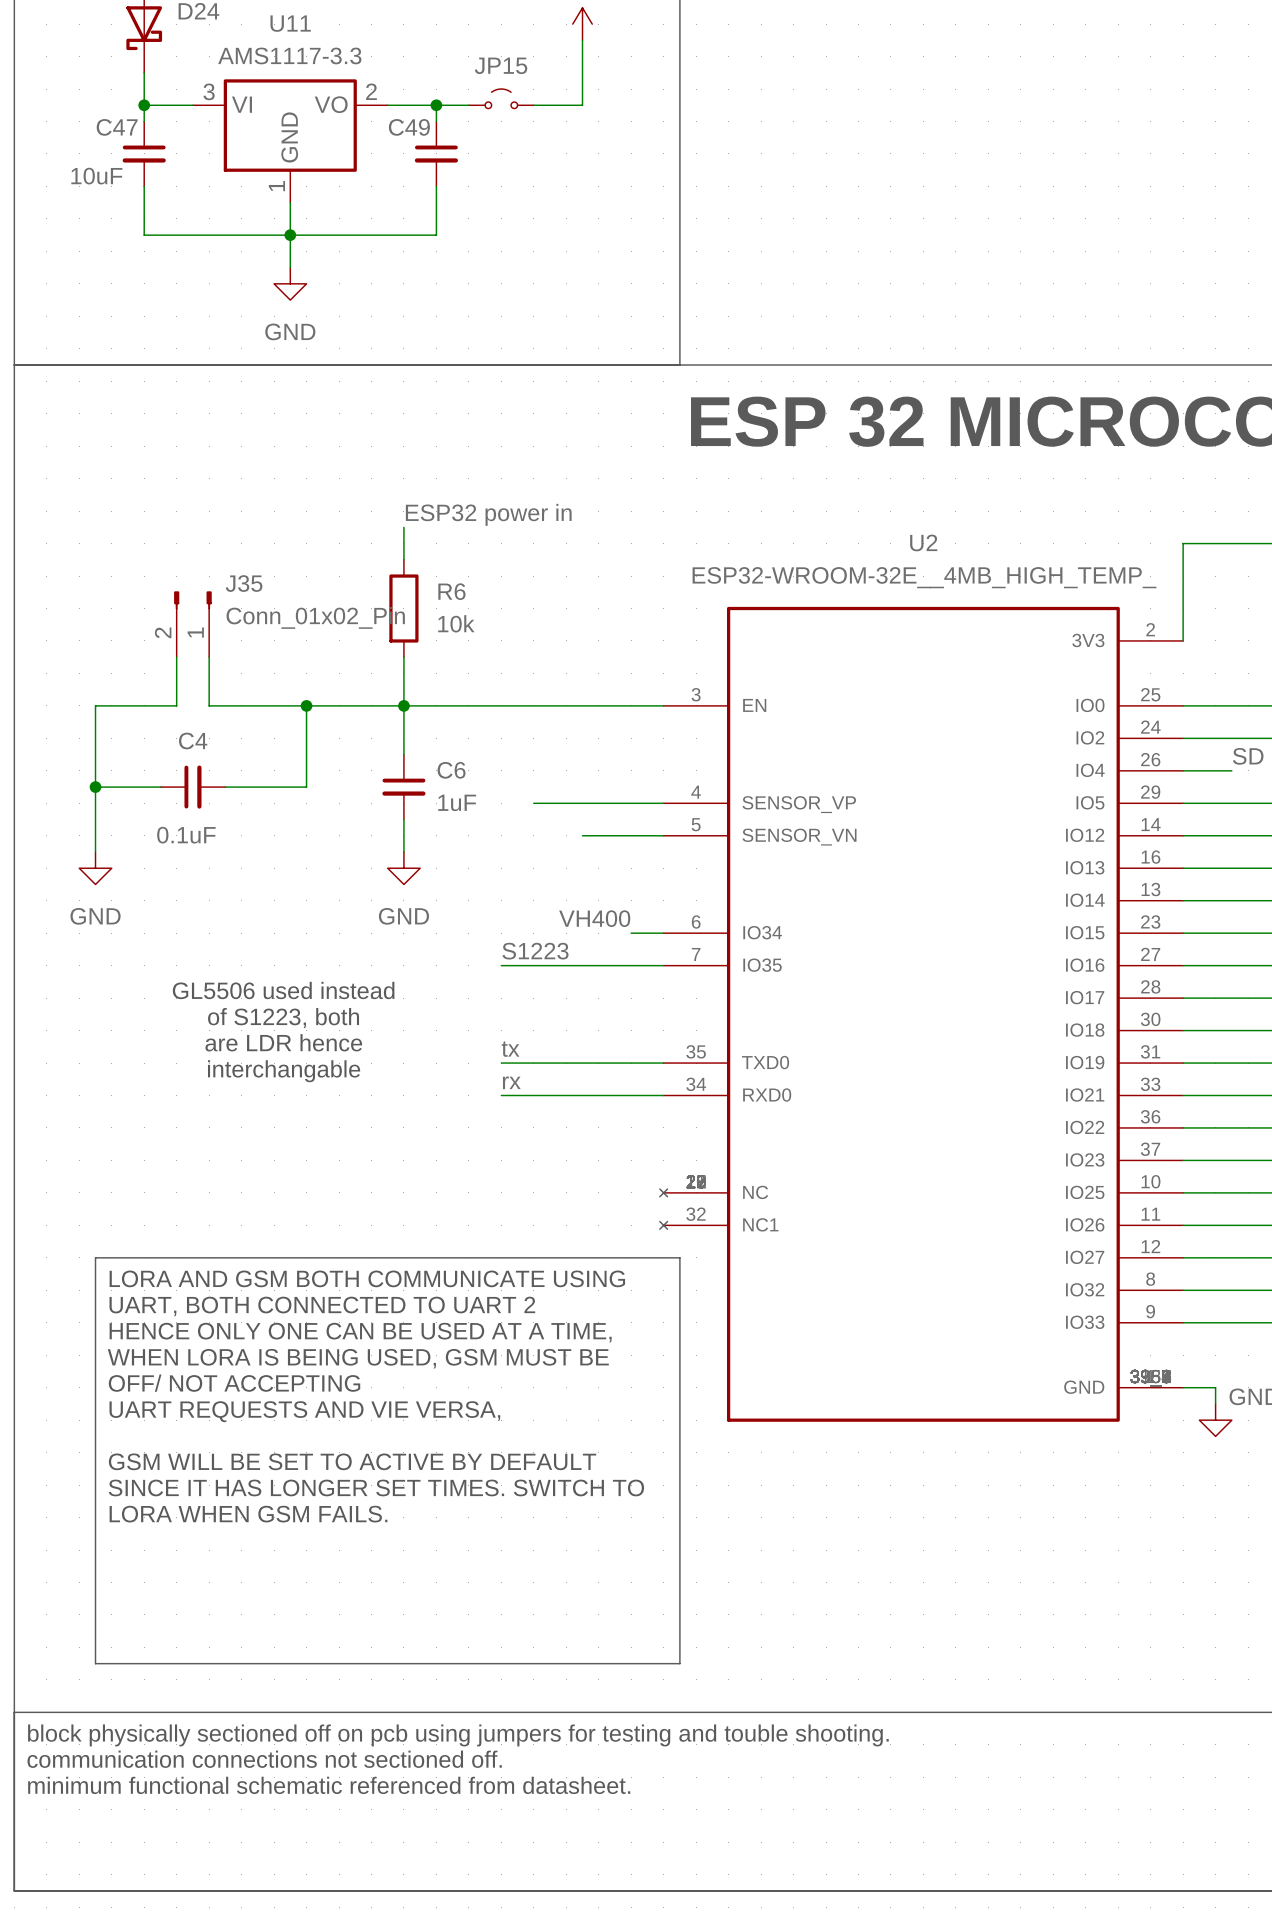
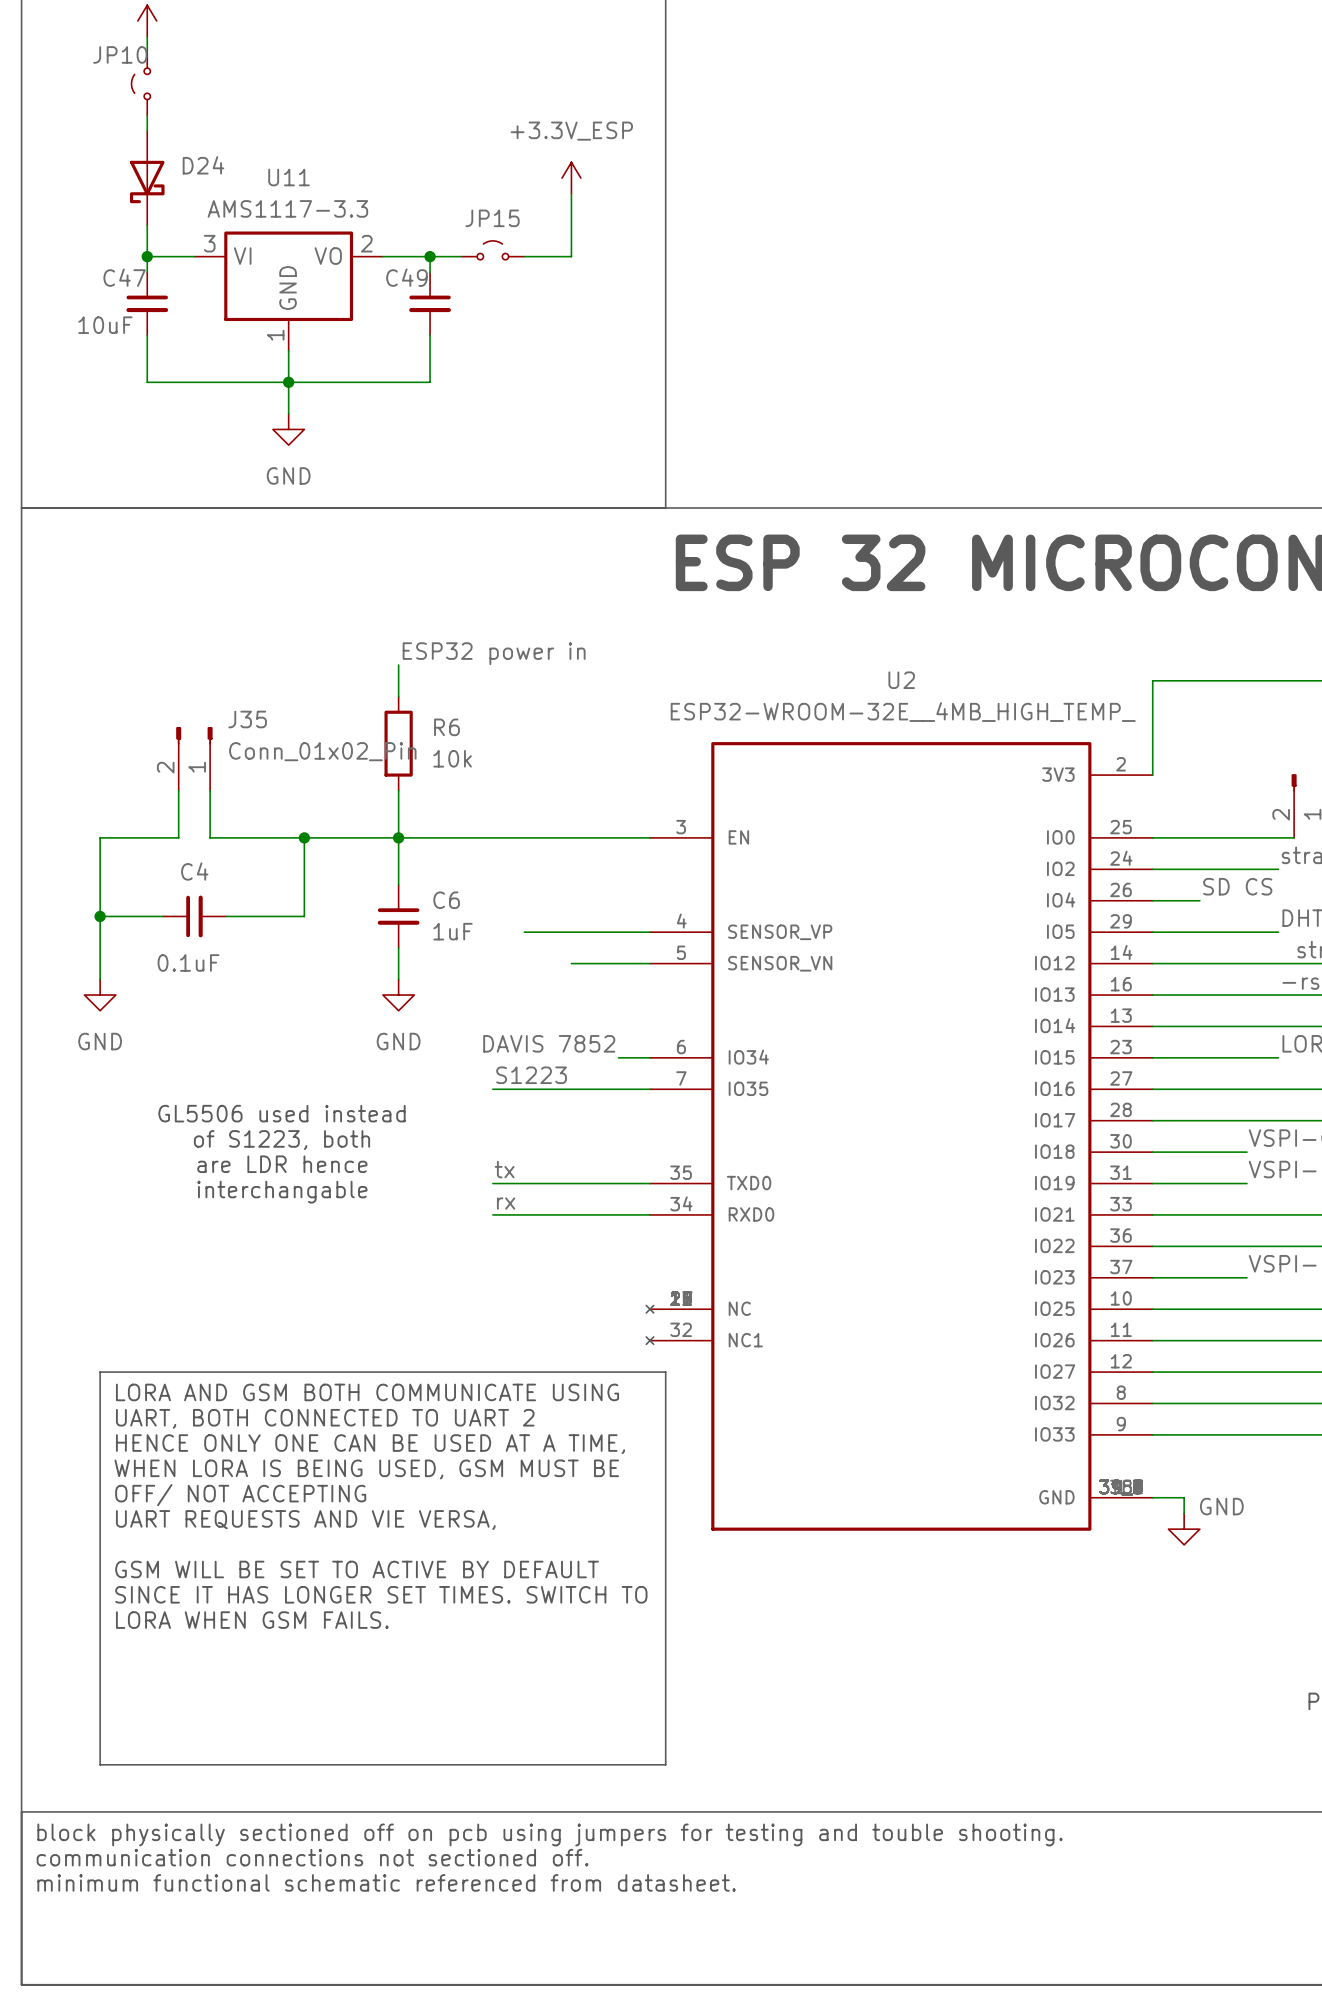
label: VH400 (594, 918) -> DAVIS 7852 (549, 1043)

